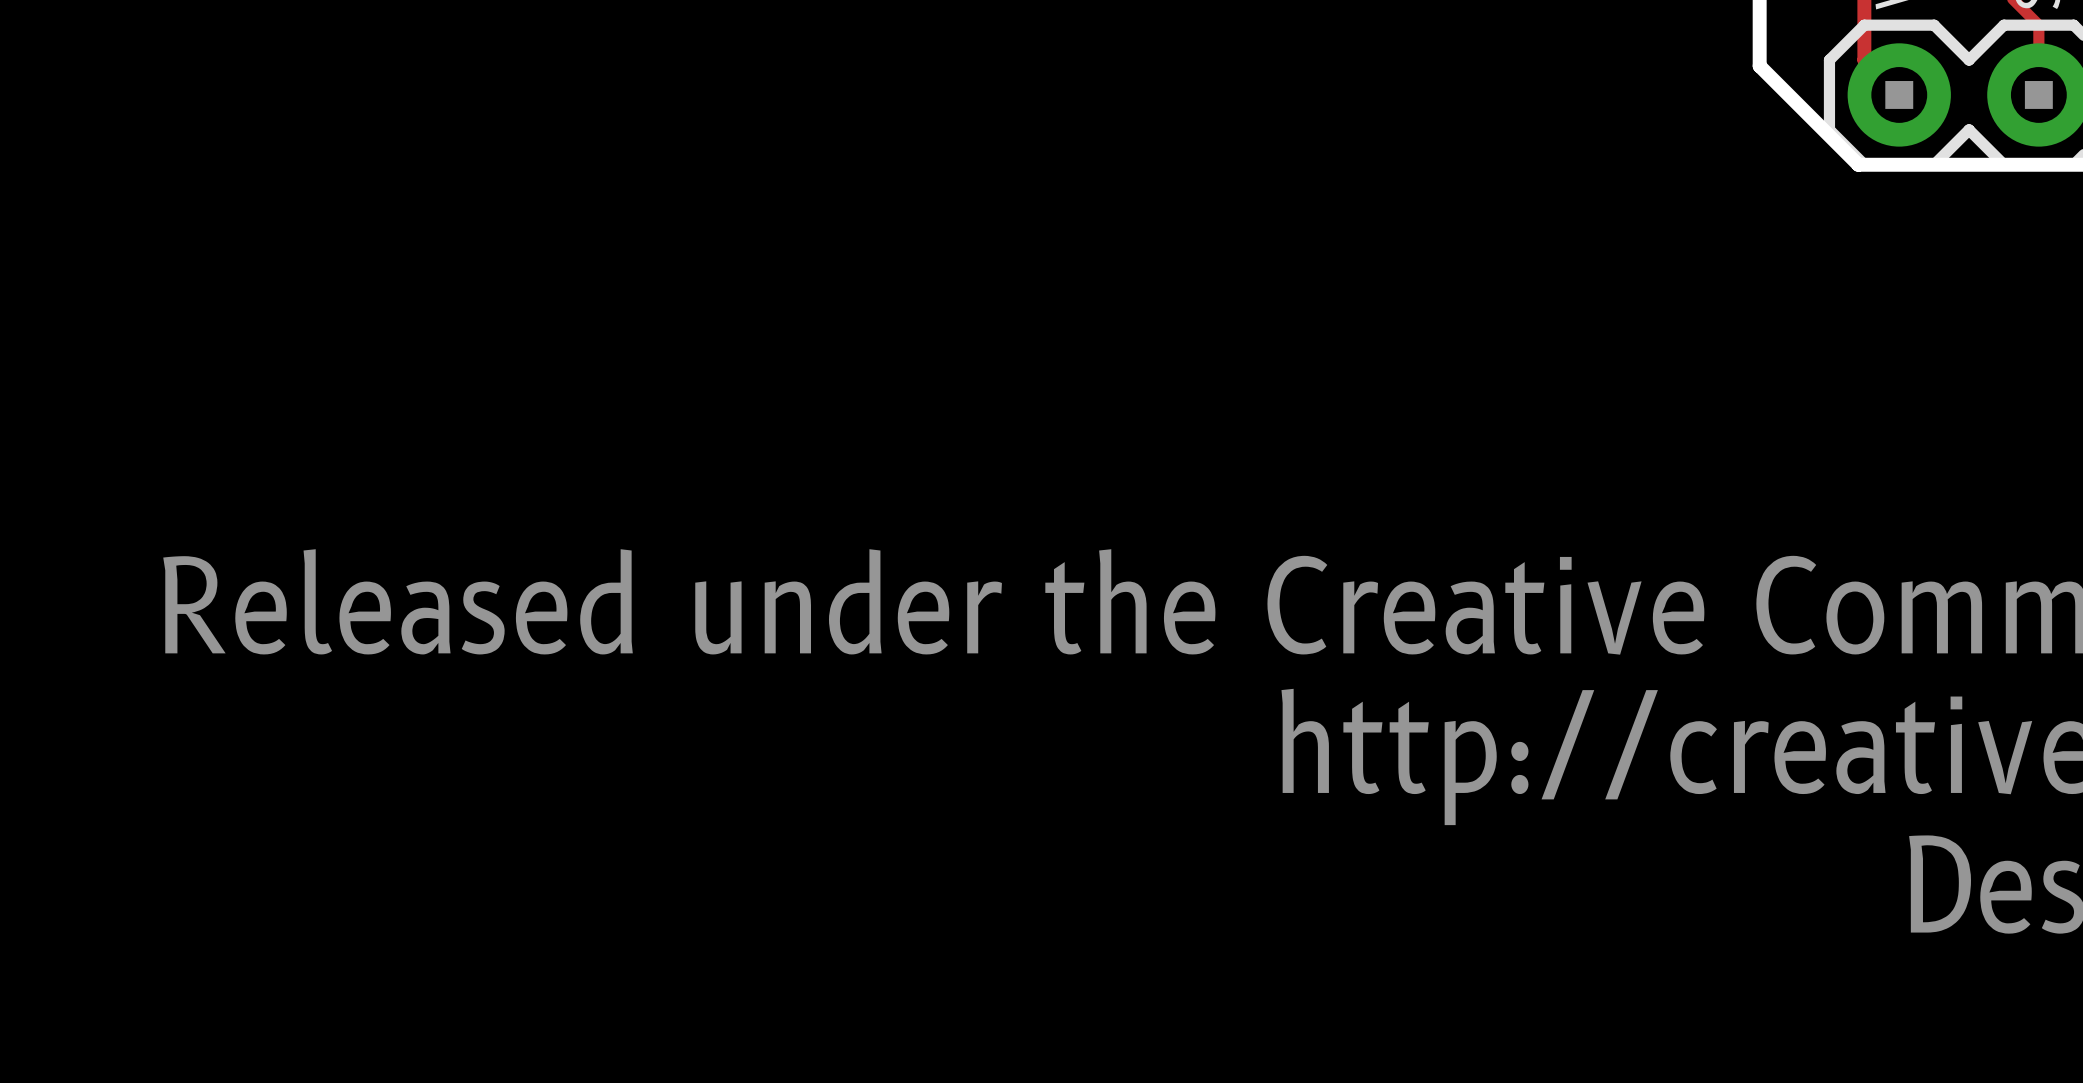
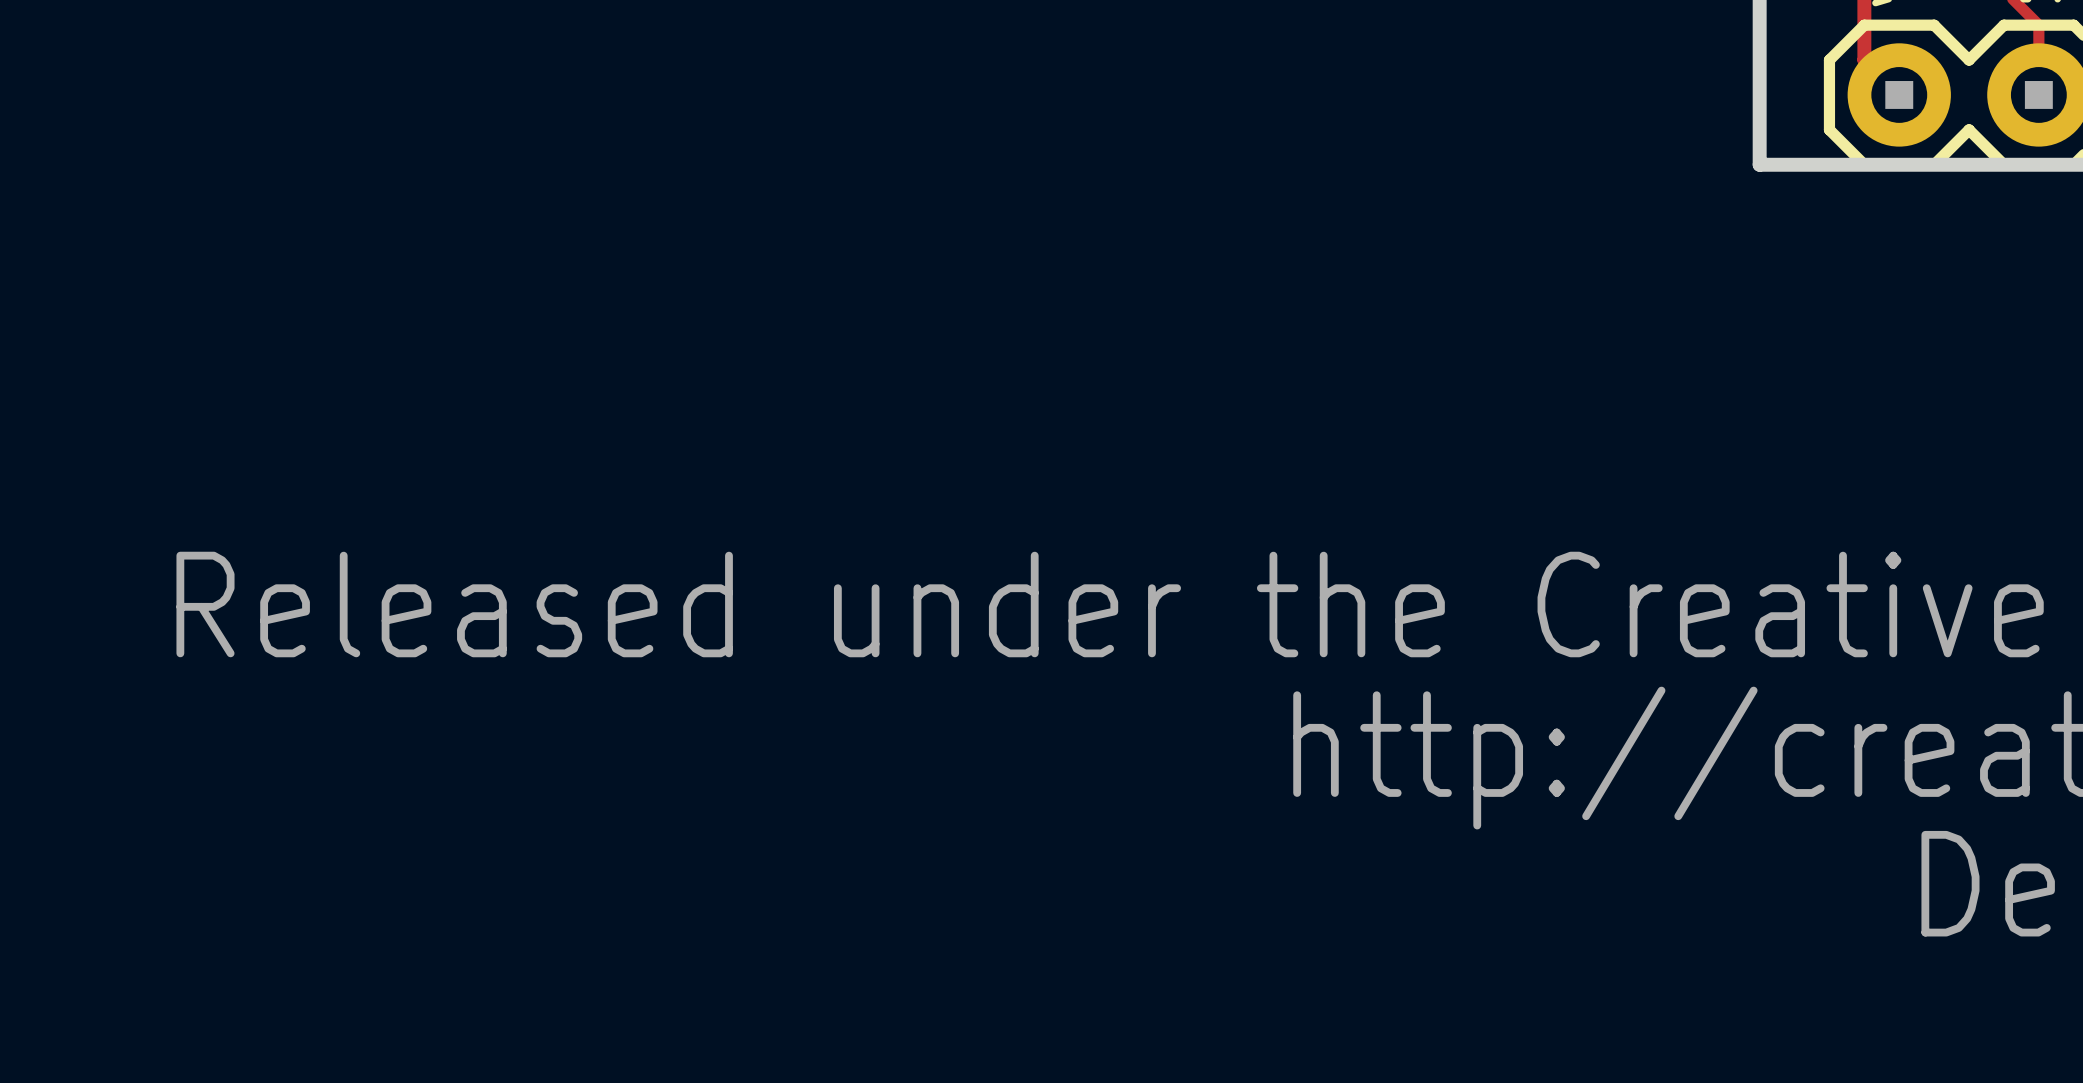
board edge: (1759, 66) (1858, 164) -> (1759, 66) (1759, 164) (1858, 164)

